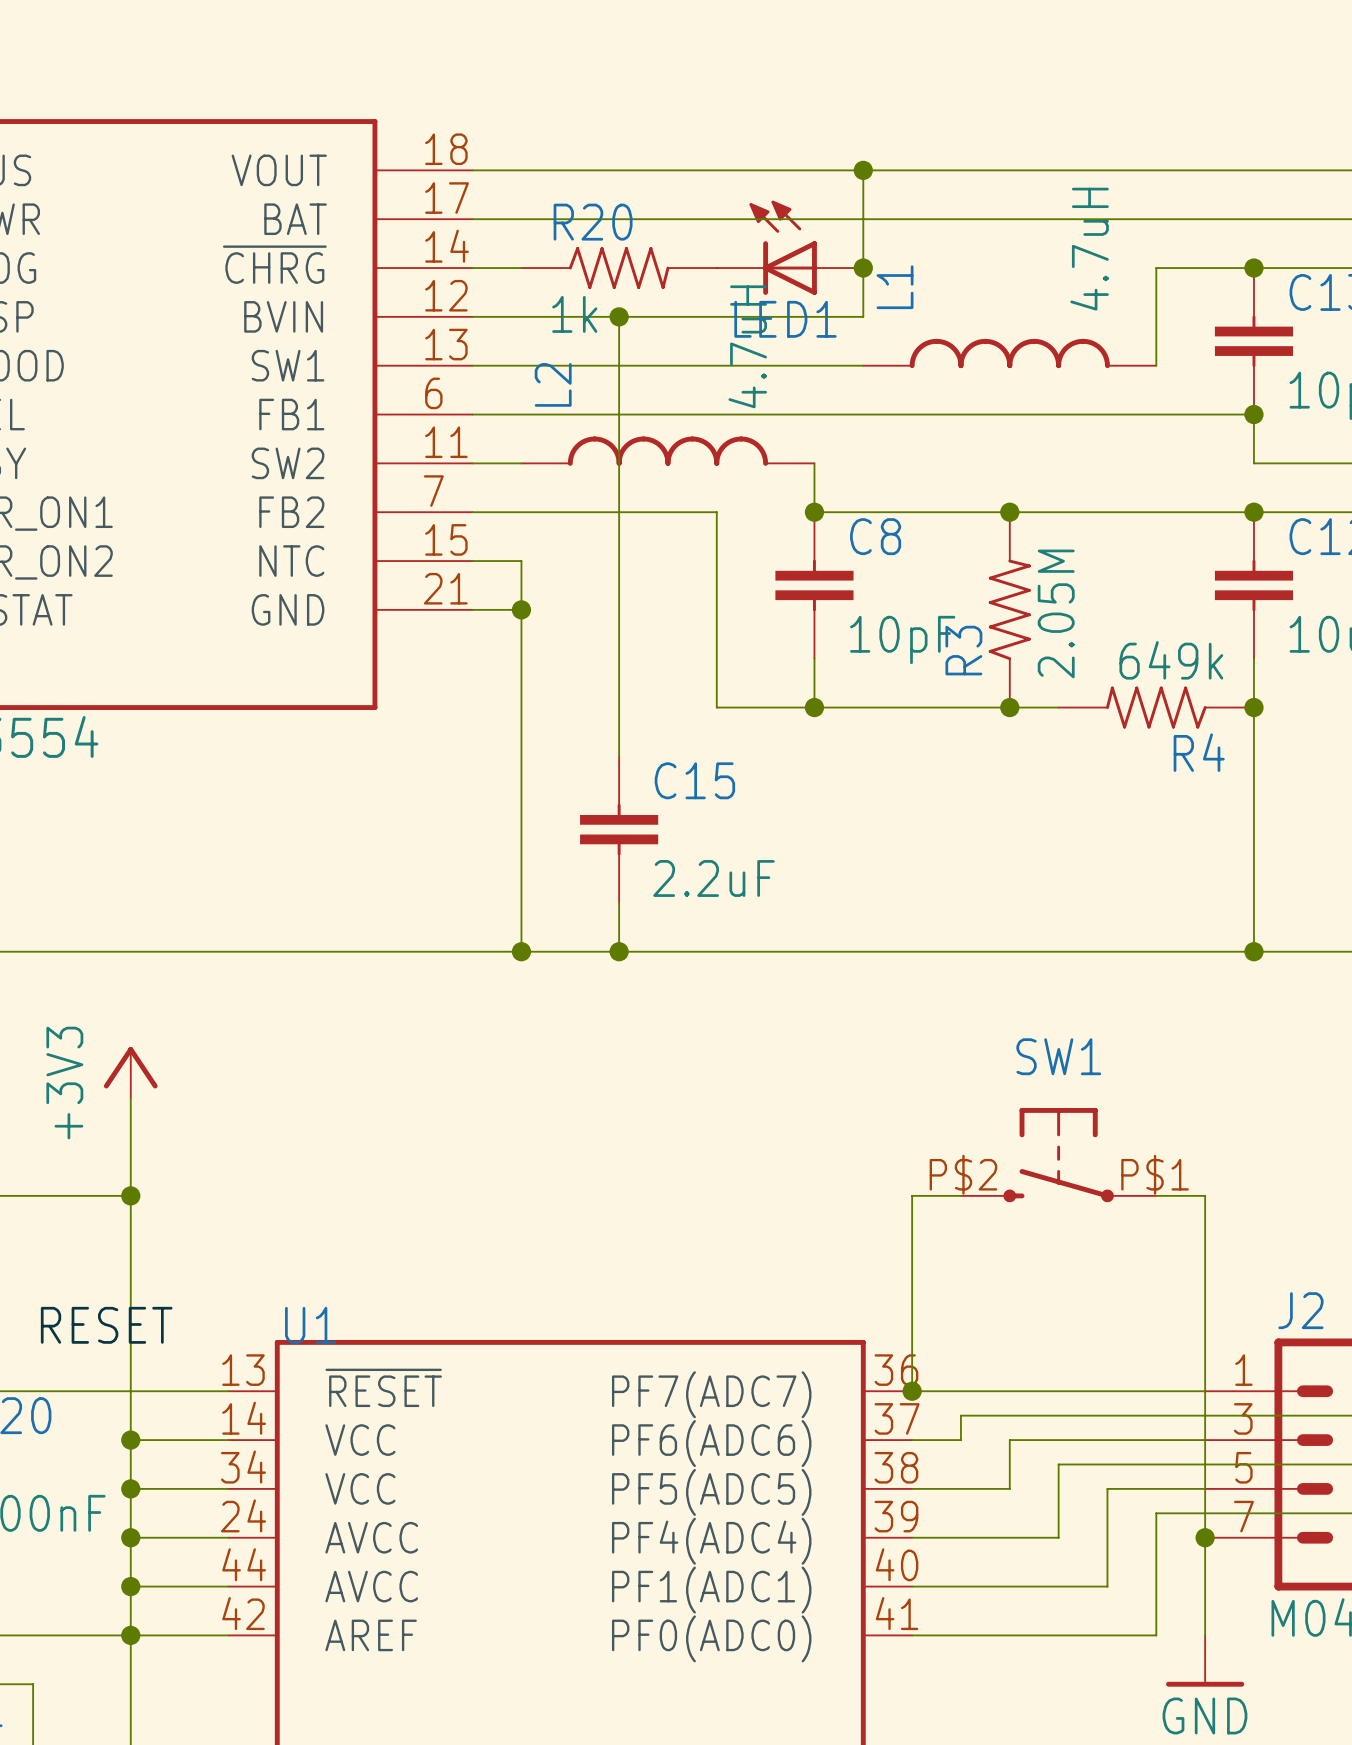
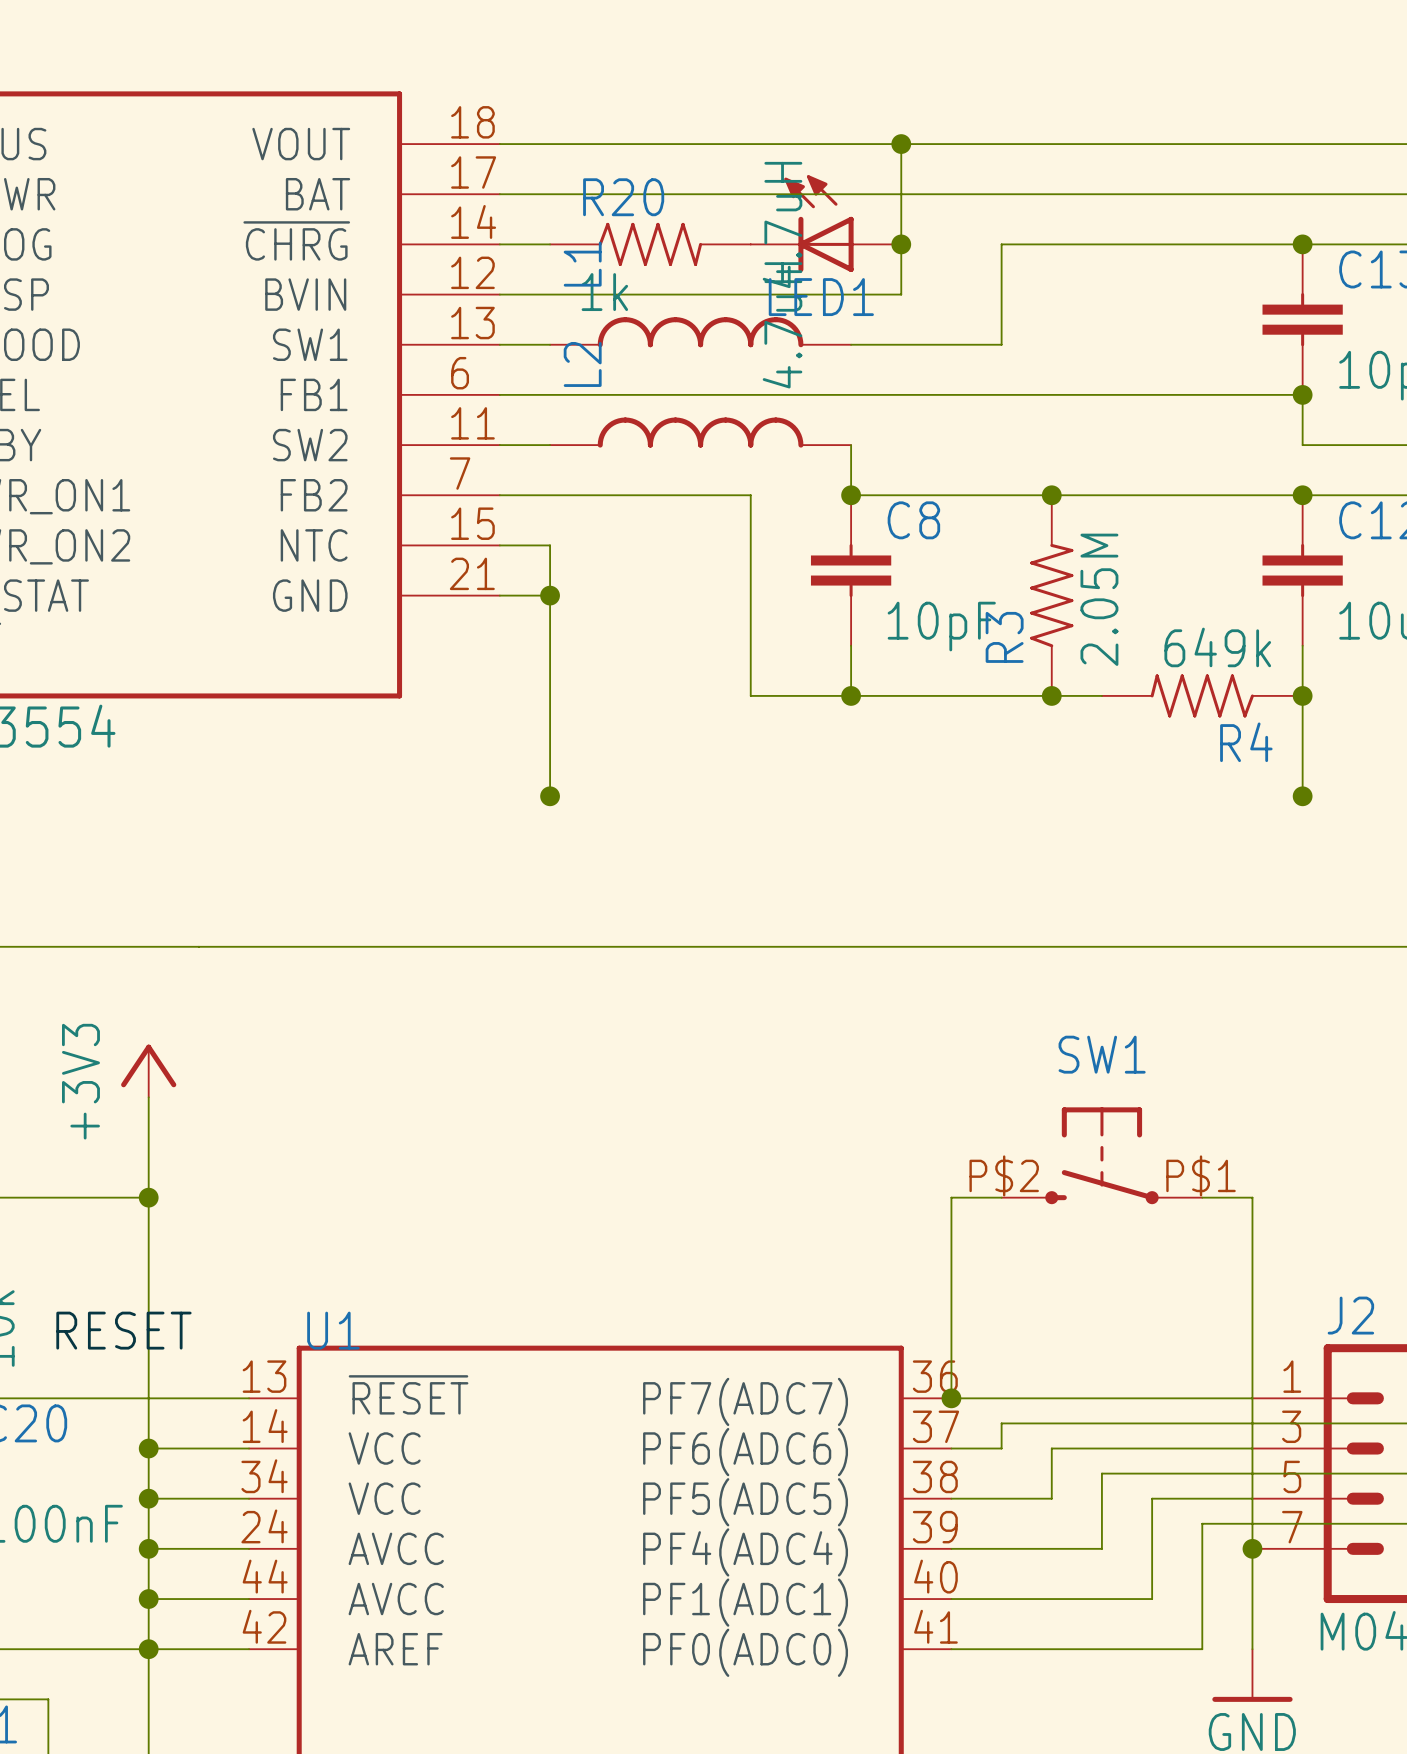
wire: (1156, 268) (1156, 365) -> (1202, 244) (1001, 244) (1001, 344) (901, 344)
wire: (619, 316) (619, 756) -> none
junction: (619, 316) -> none
L1 position: (1009, 353) -> (700, 332)
wire: (521, 365) (814, 365) -> none
wire: (521, 805) (521, 951) -> none
junction: none -> (550, 796)
wire: (1253, 805) (1253, 951) -> none
junction: none -> (1302, 796)
C15: 2.2uF (619, 829) -> none
wire: (619, 902) (619, 951) -> none
junction: (521, 951) -> none
junction: (619, 951) -> none
junction: (1253, 951) -> none

